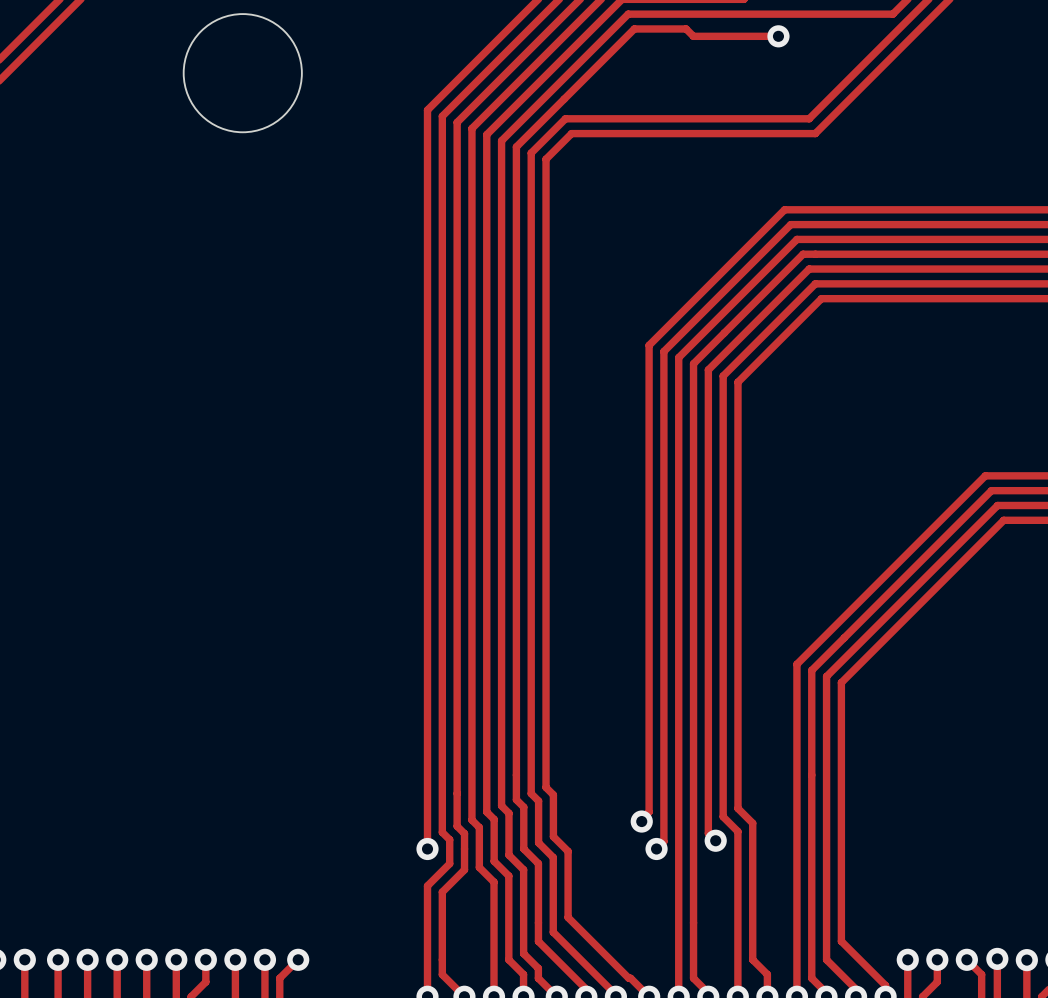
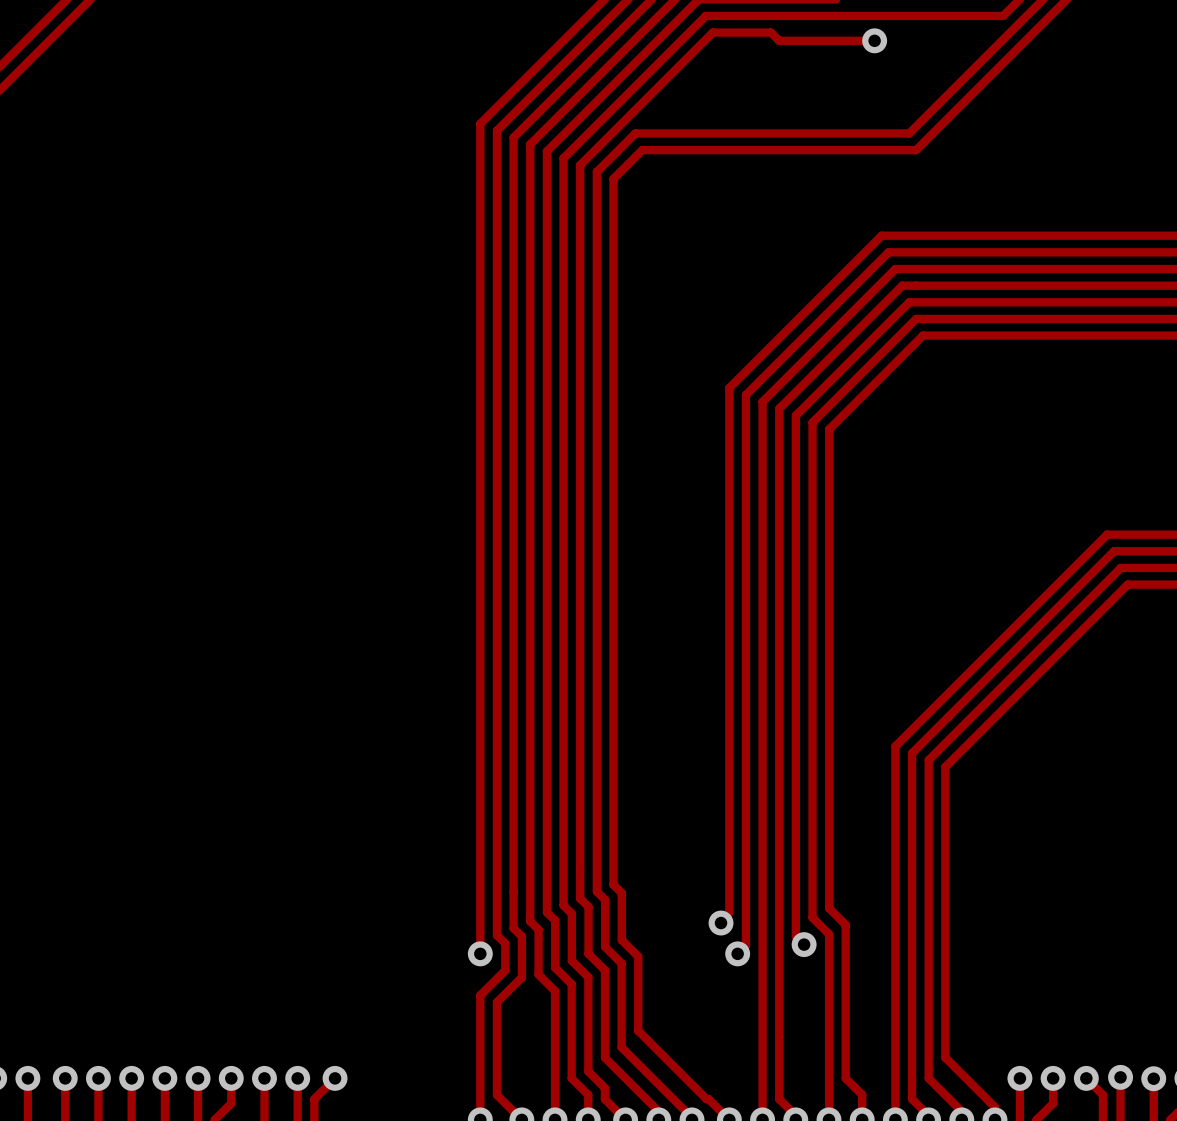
round board edge: [182, 13, 303, 134] -> none

